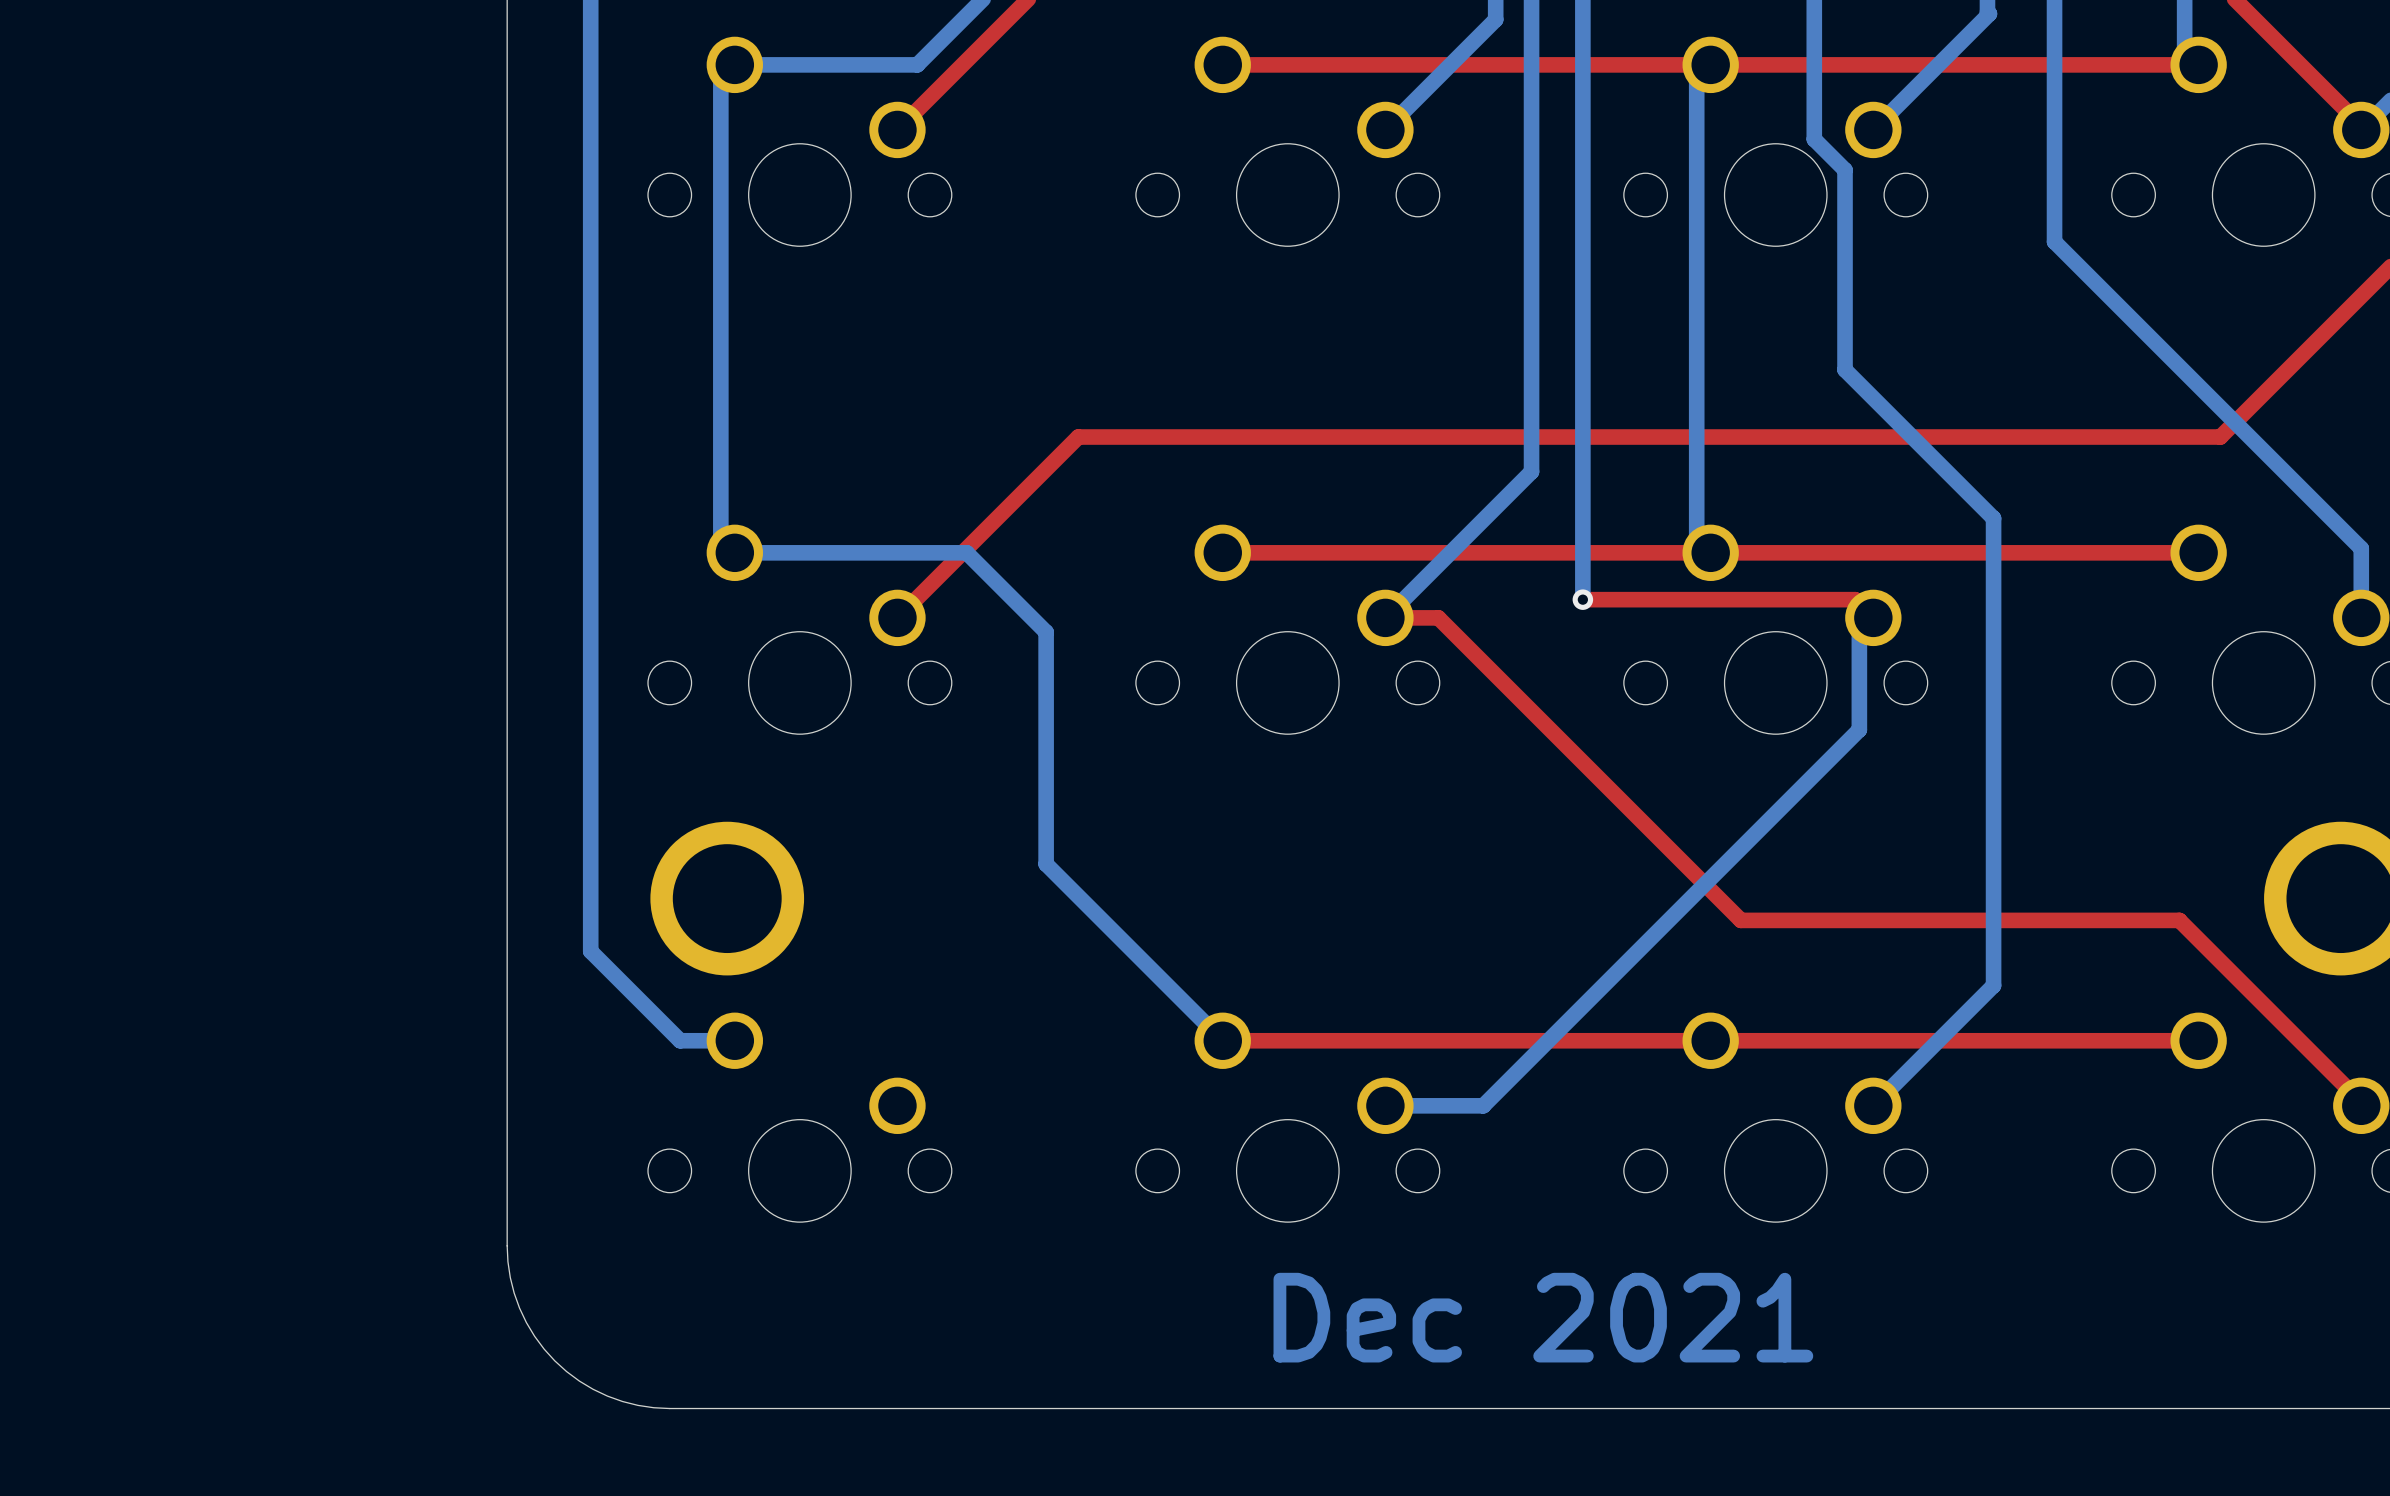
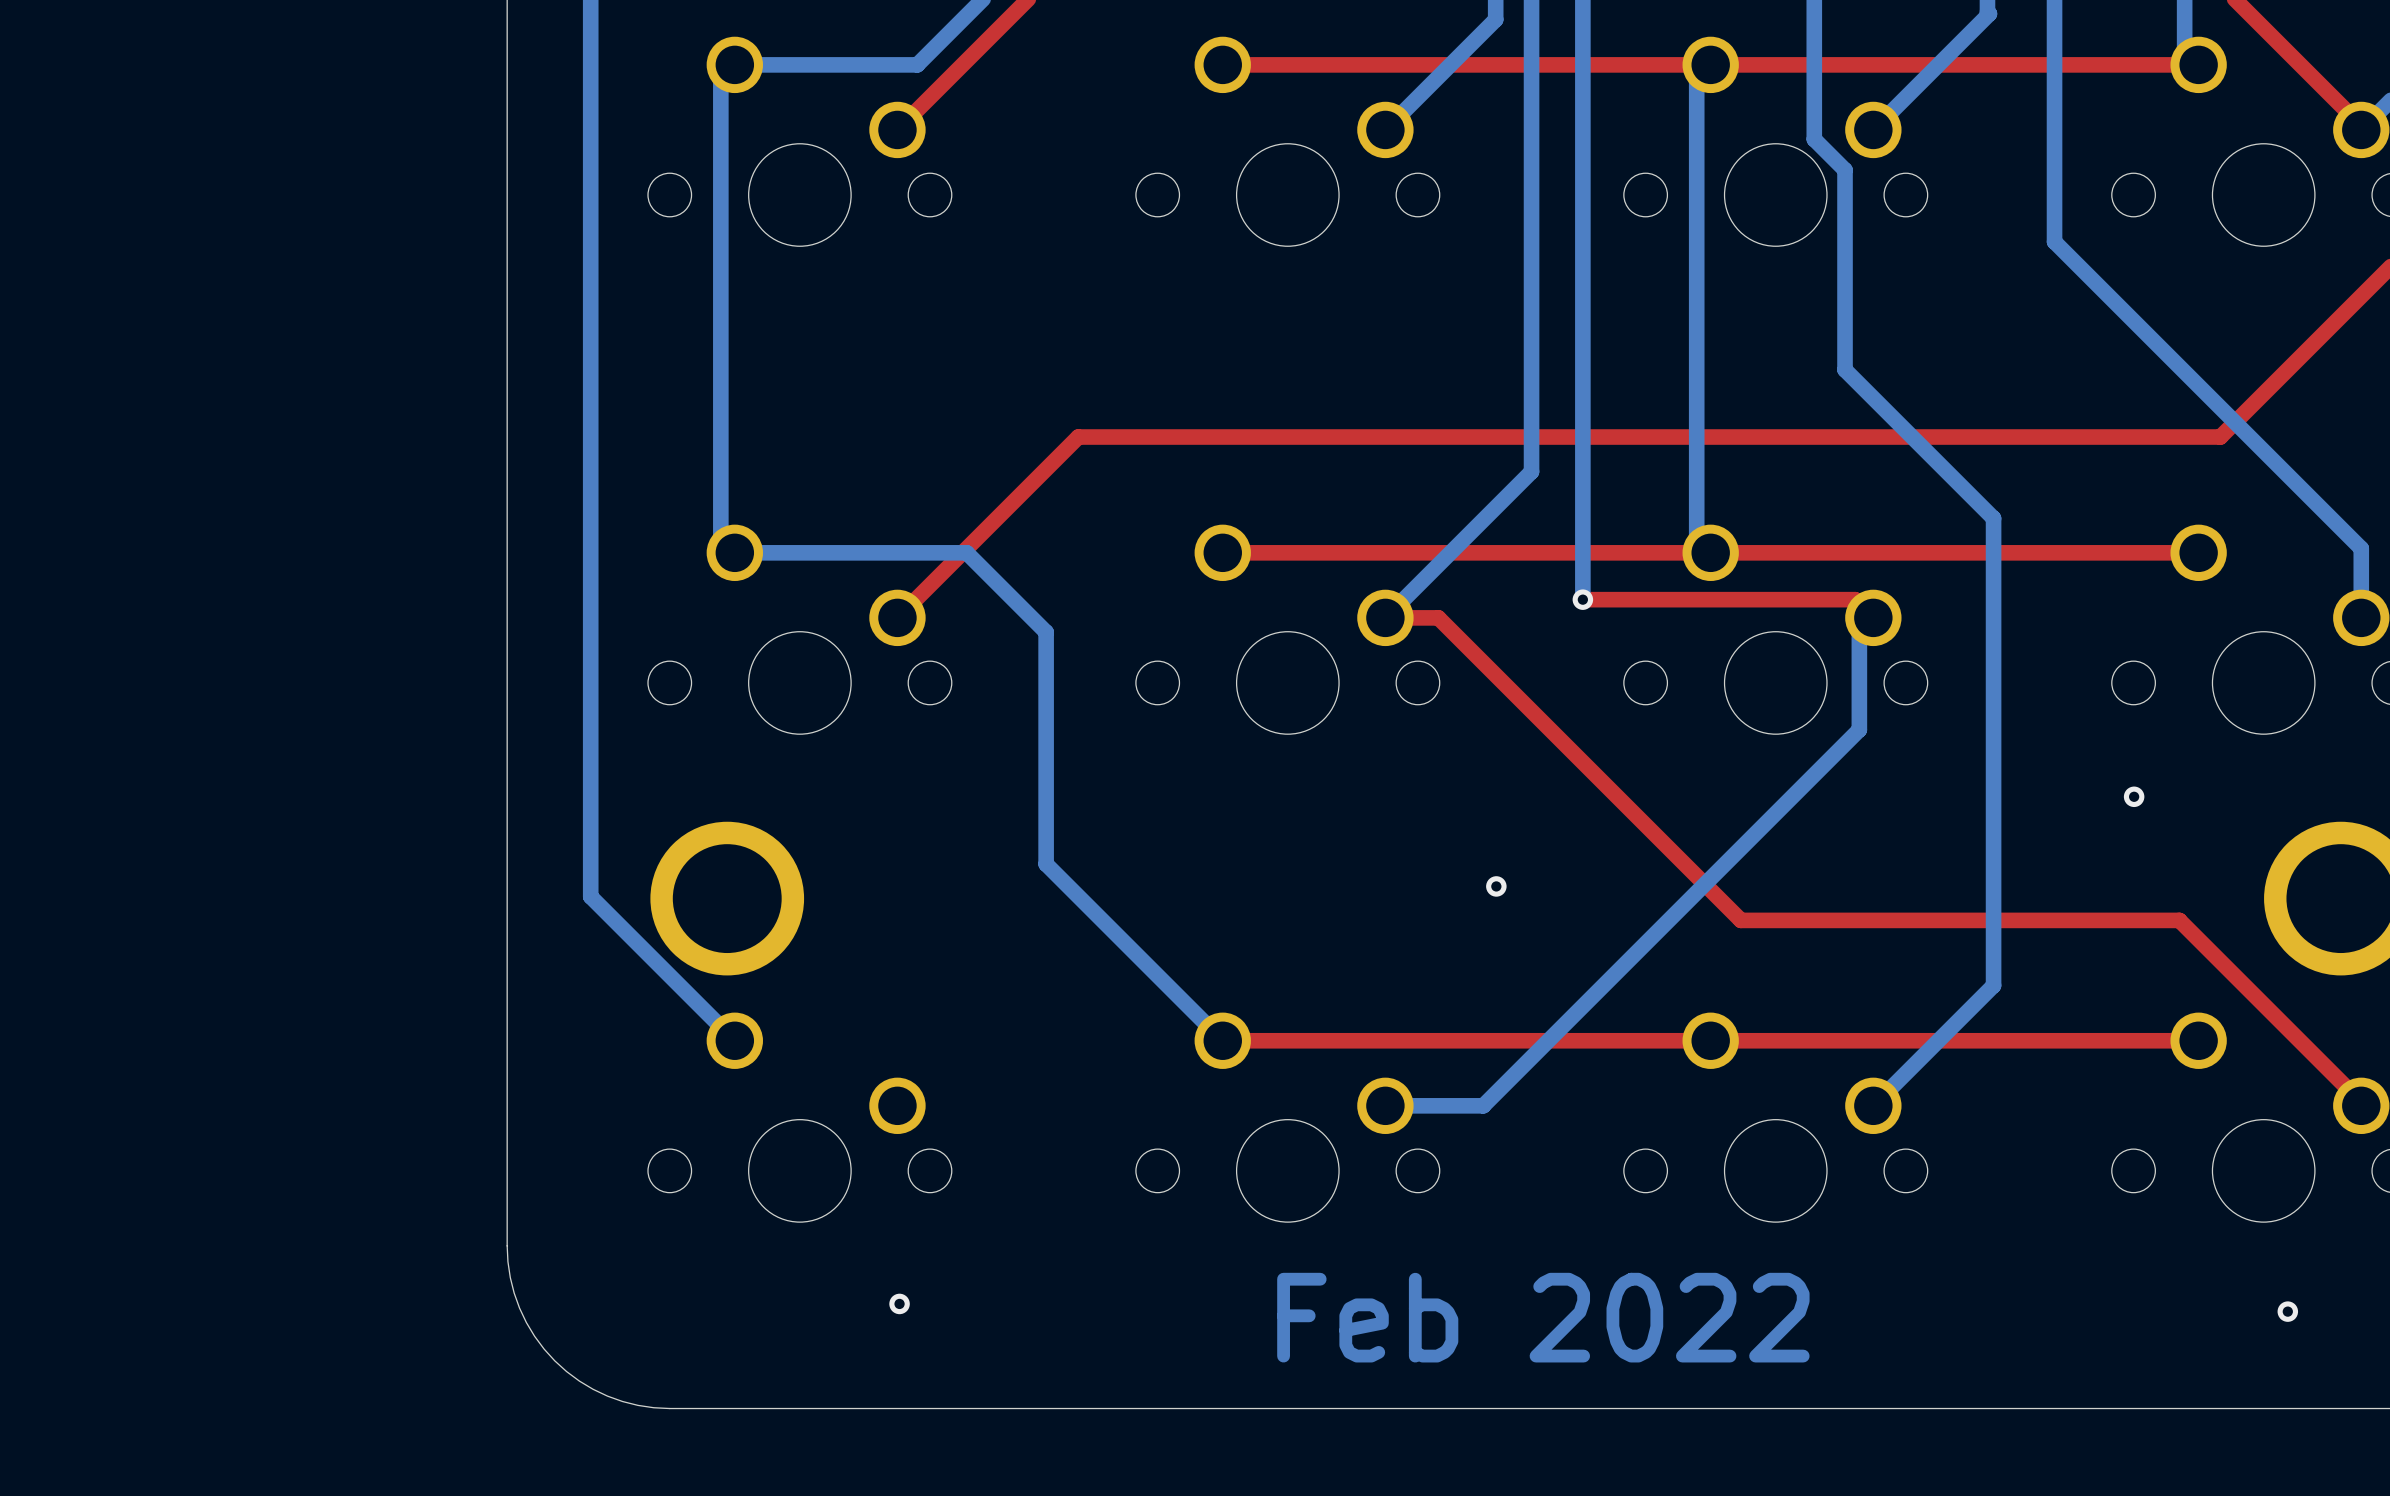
via: none -> (2134, 796)
via: none -> (1496, 886)
bottom track: (590, 896) (590, 951) (680, 1040) (734, 1040) -> (590, 896) (734, 1040)
via: none -> (899, 1303)
via: none -> (2287, 1311)
text: Dec 2021 (1543, 1317) -> Feb 2022 (1543, 1317)

